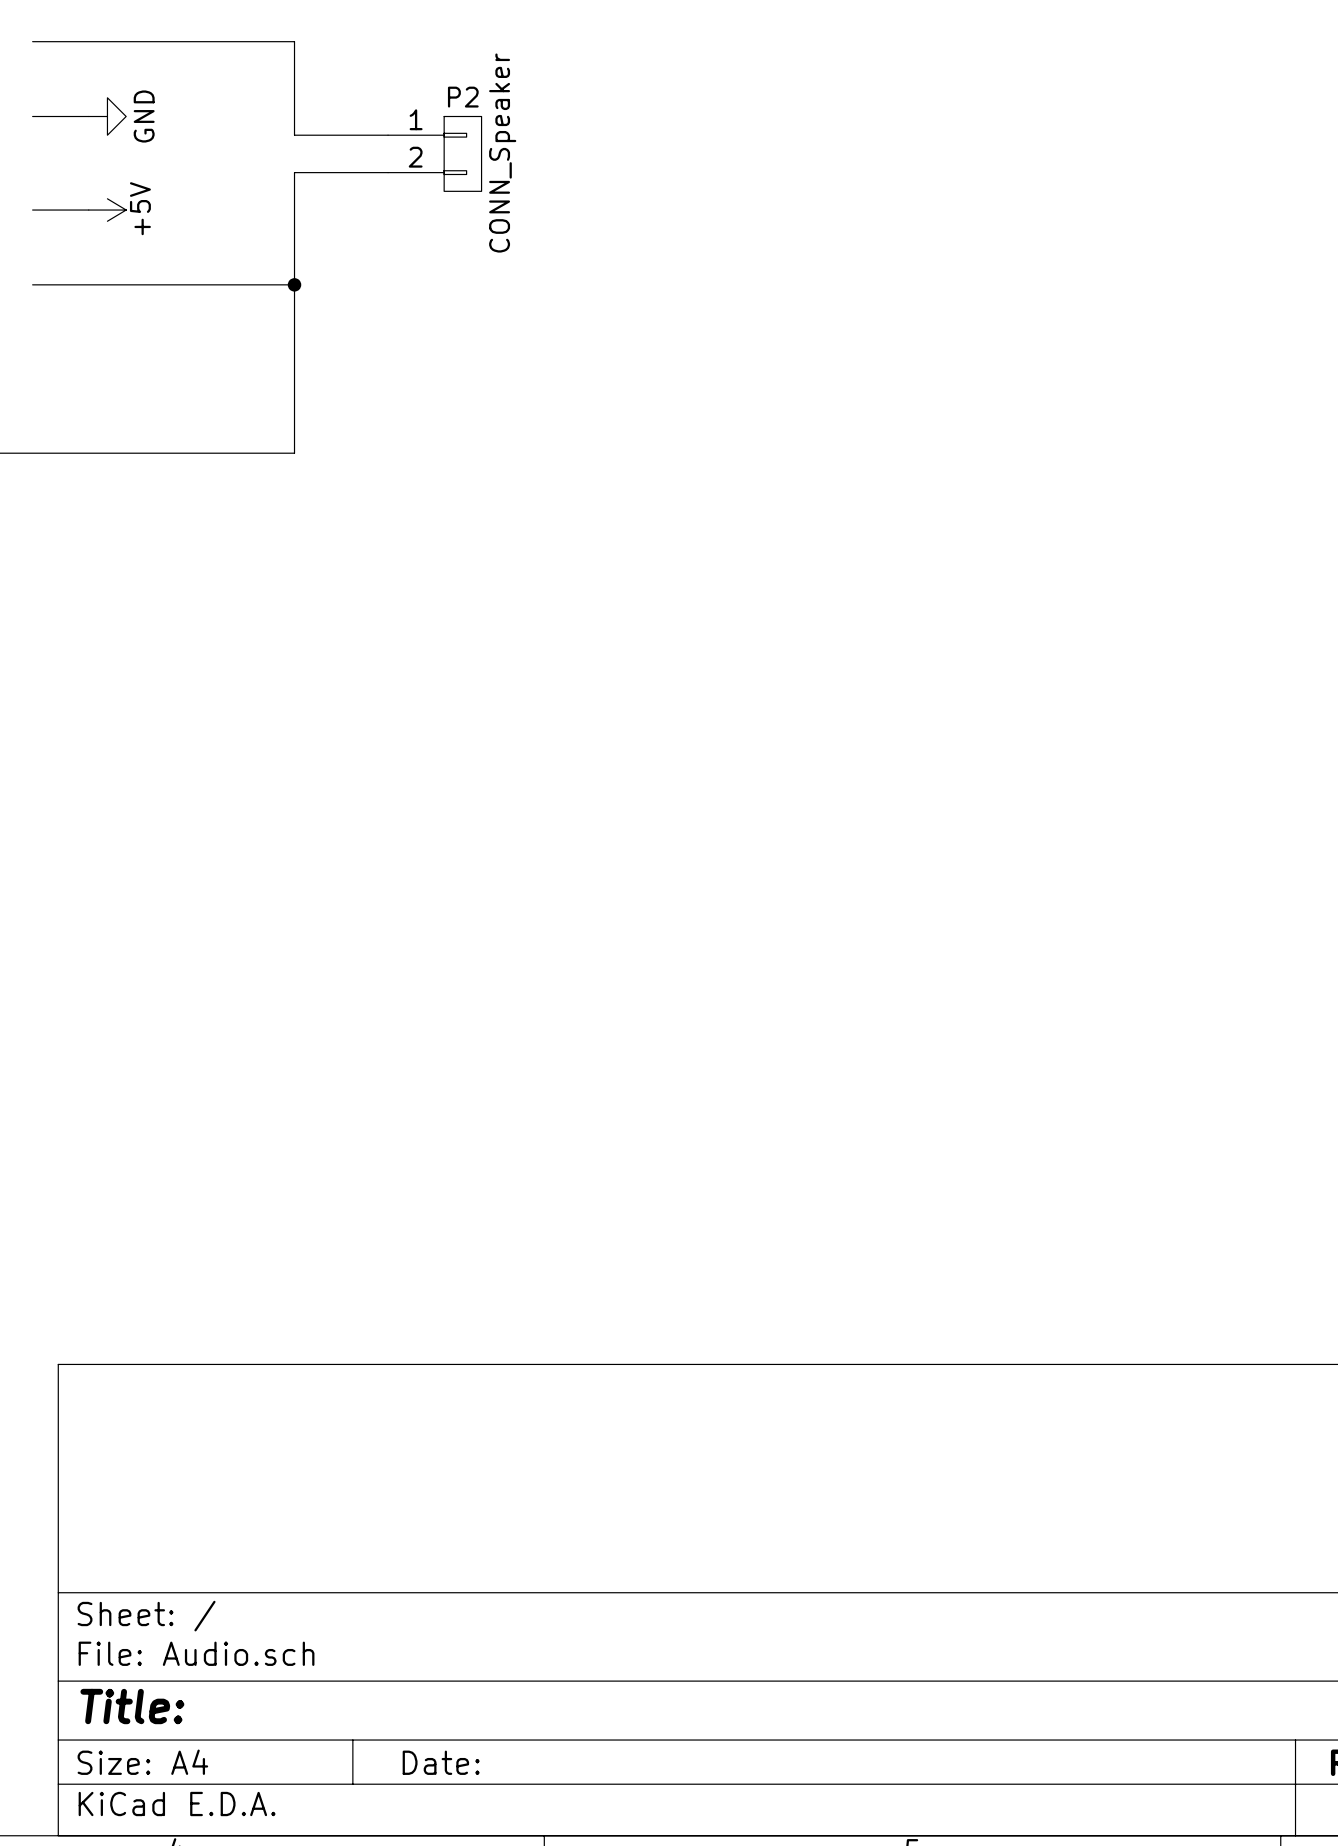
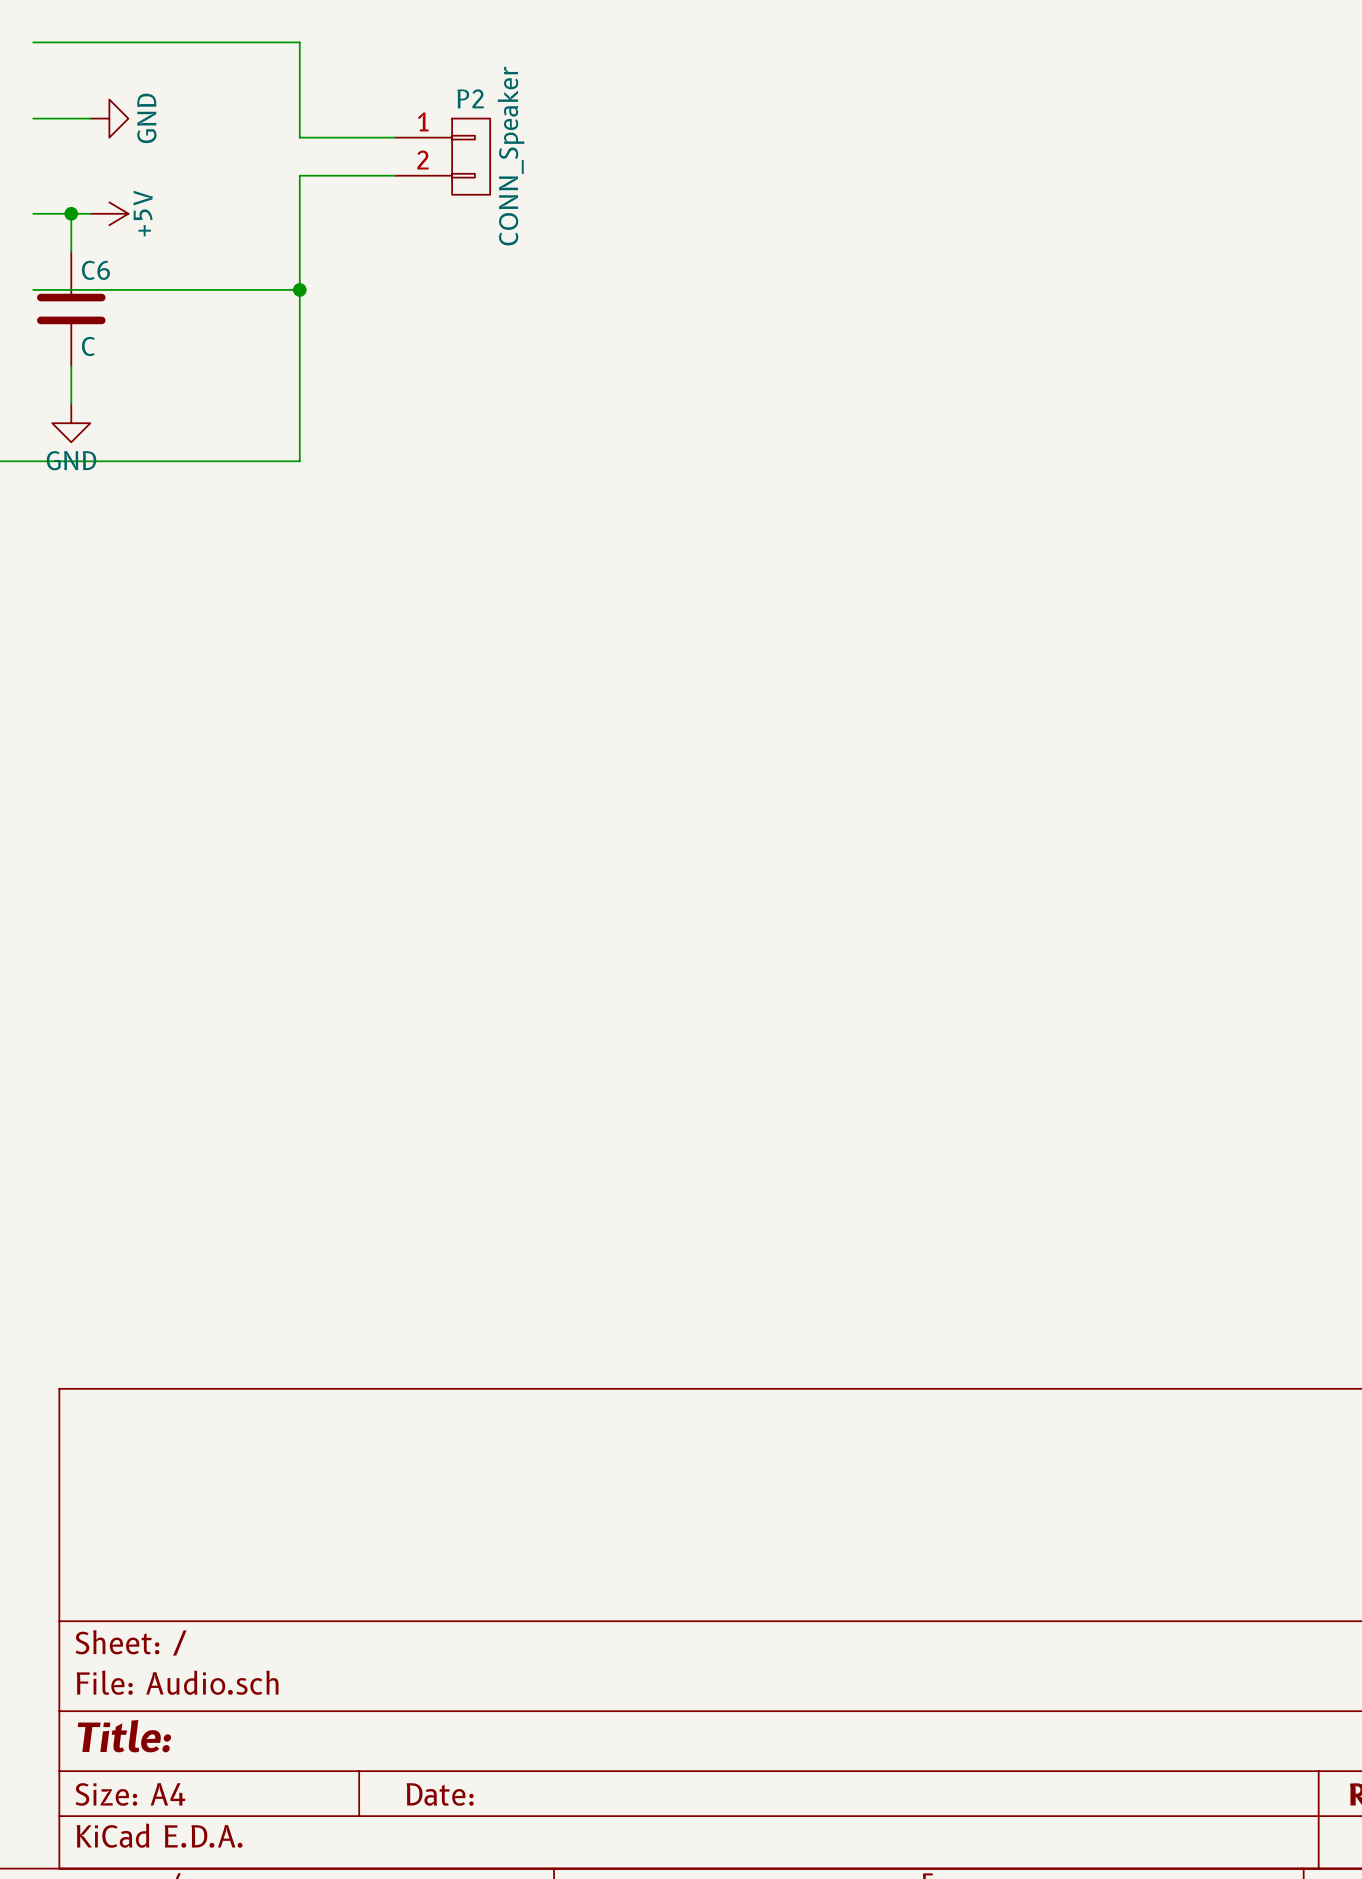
wire: none -> (71, 213) (71, 251)
junction: none -> (71, 213)
C6: none -> C (71, 308)
wire: none -> (71, 366) (71, 404)
power symbol: none -> GND (71, 423)

